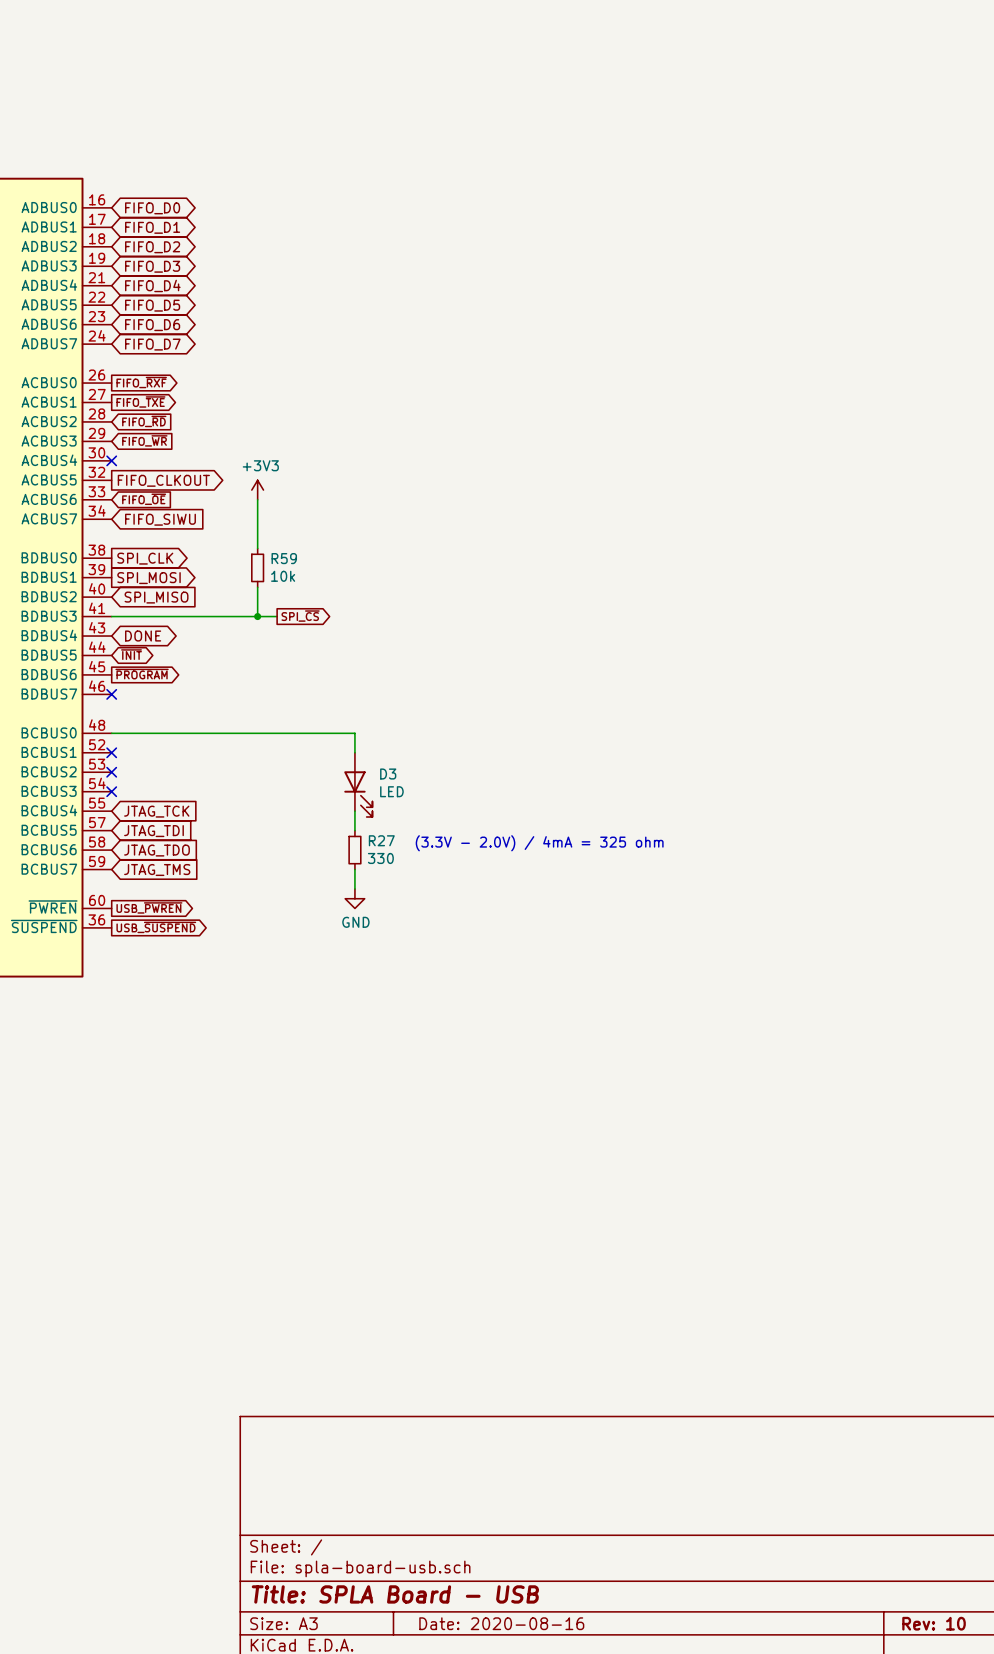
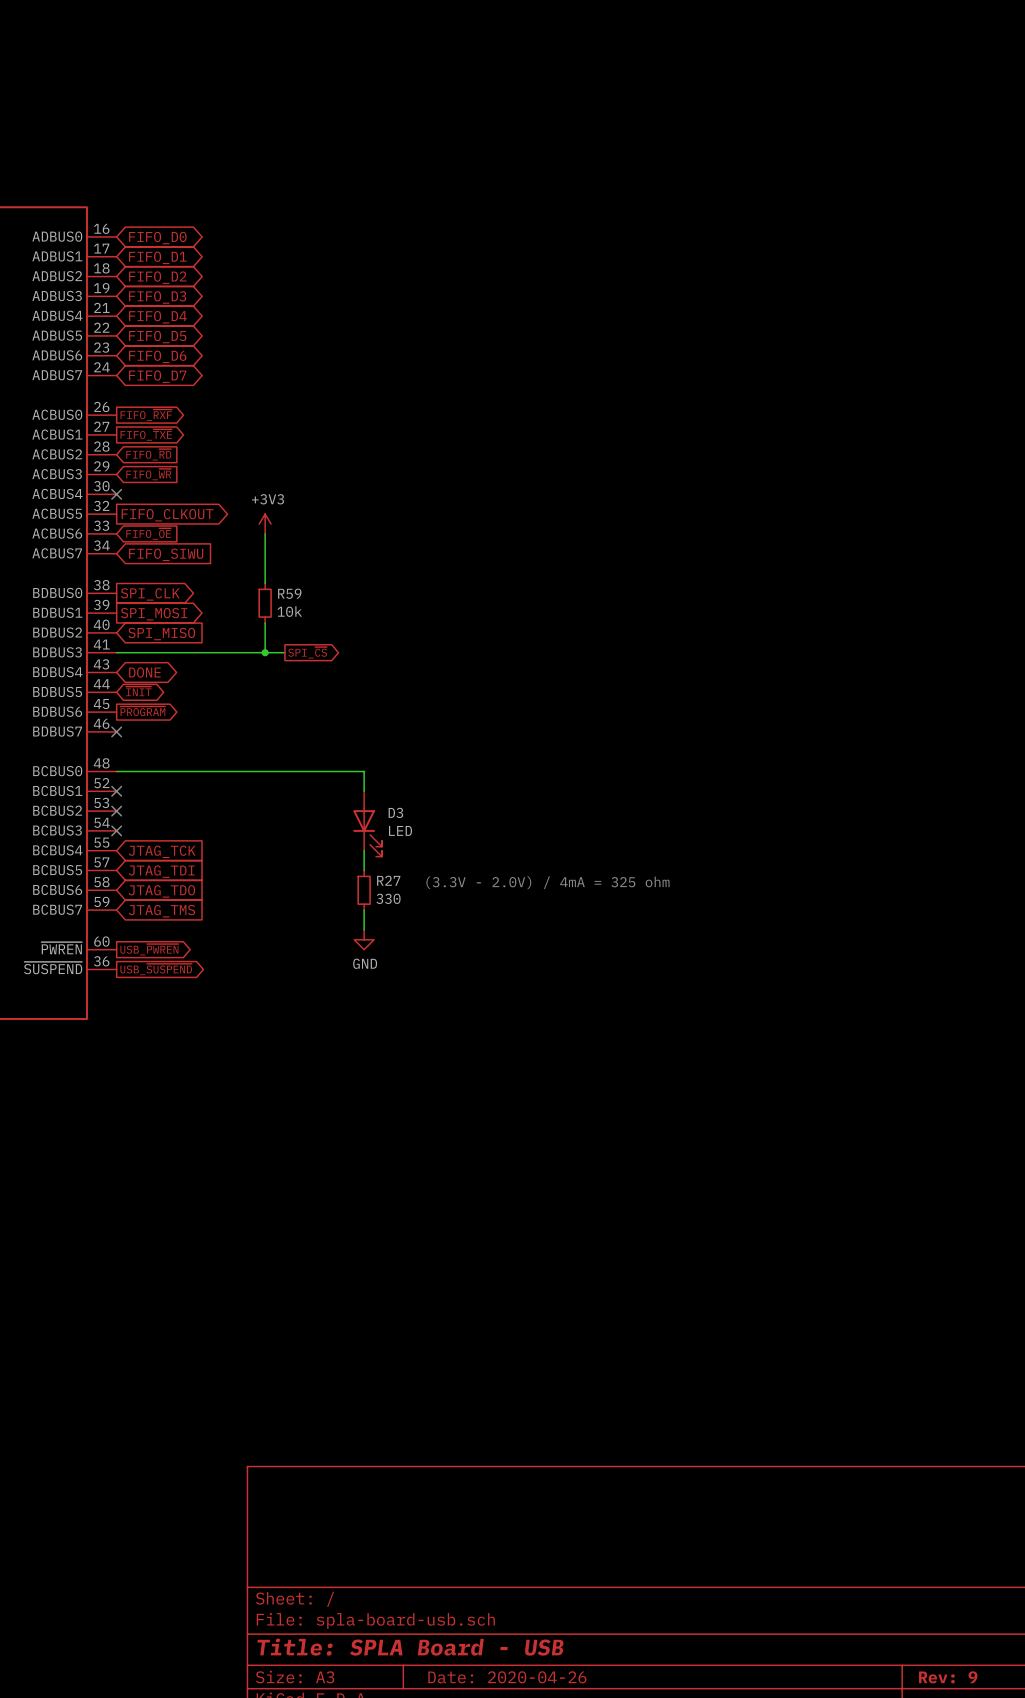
title block: Date: 2020-08-16 (501, 1623) -> Date: 2020-04-26 (507, 1677)
title block: Rev: 10 (934, 1623) -> Rev: 9 (948, 1677)

